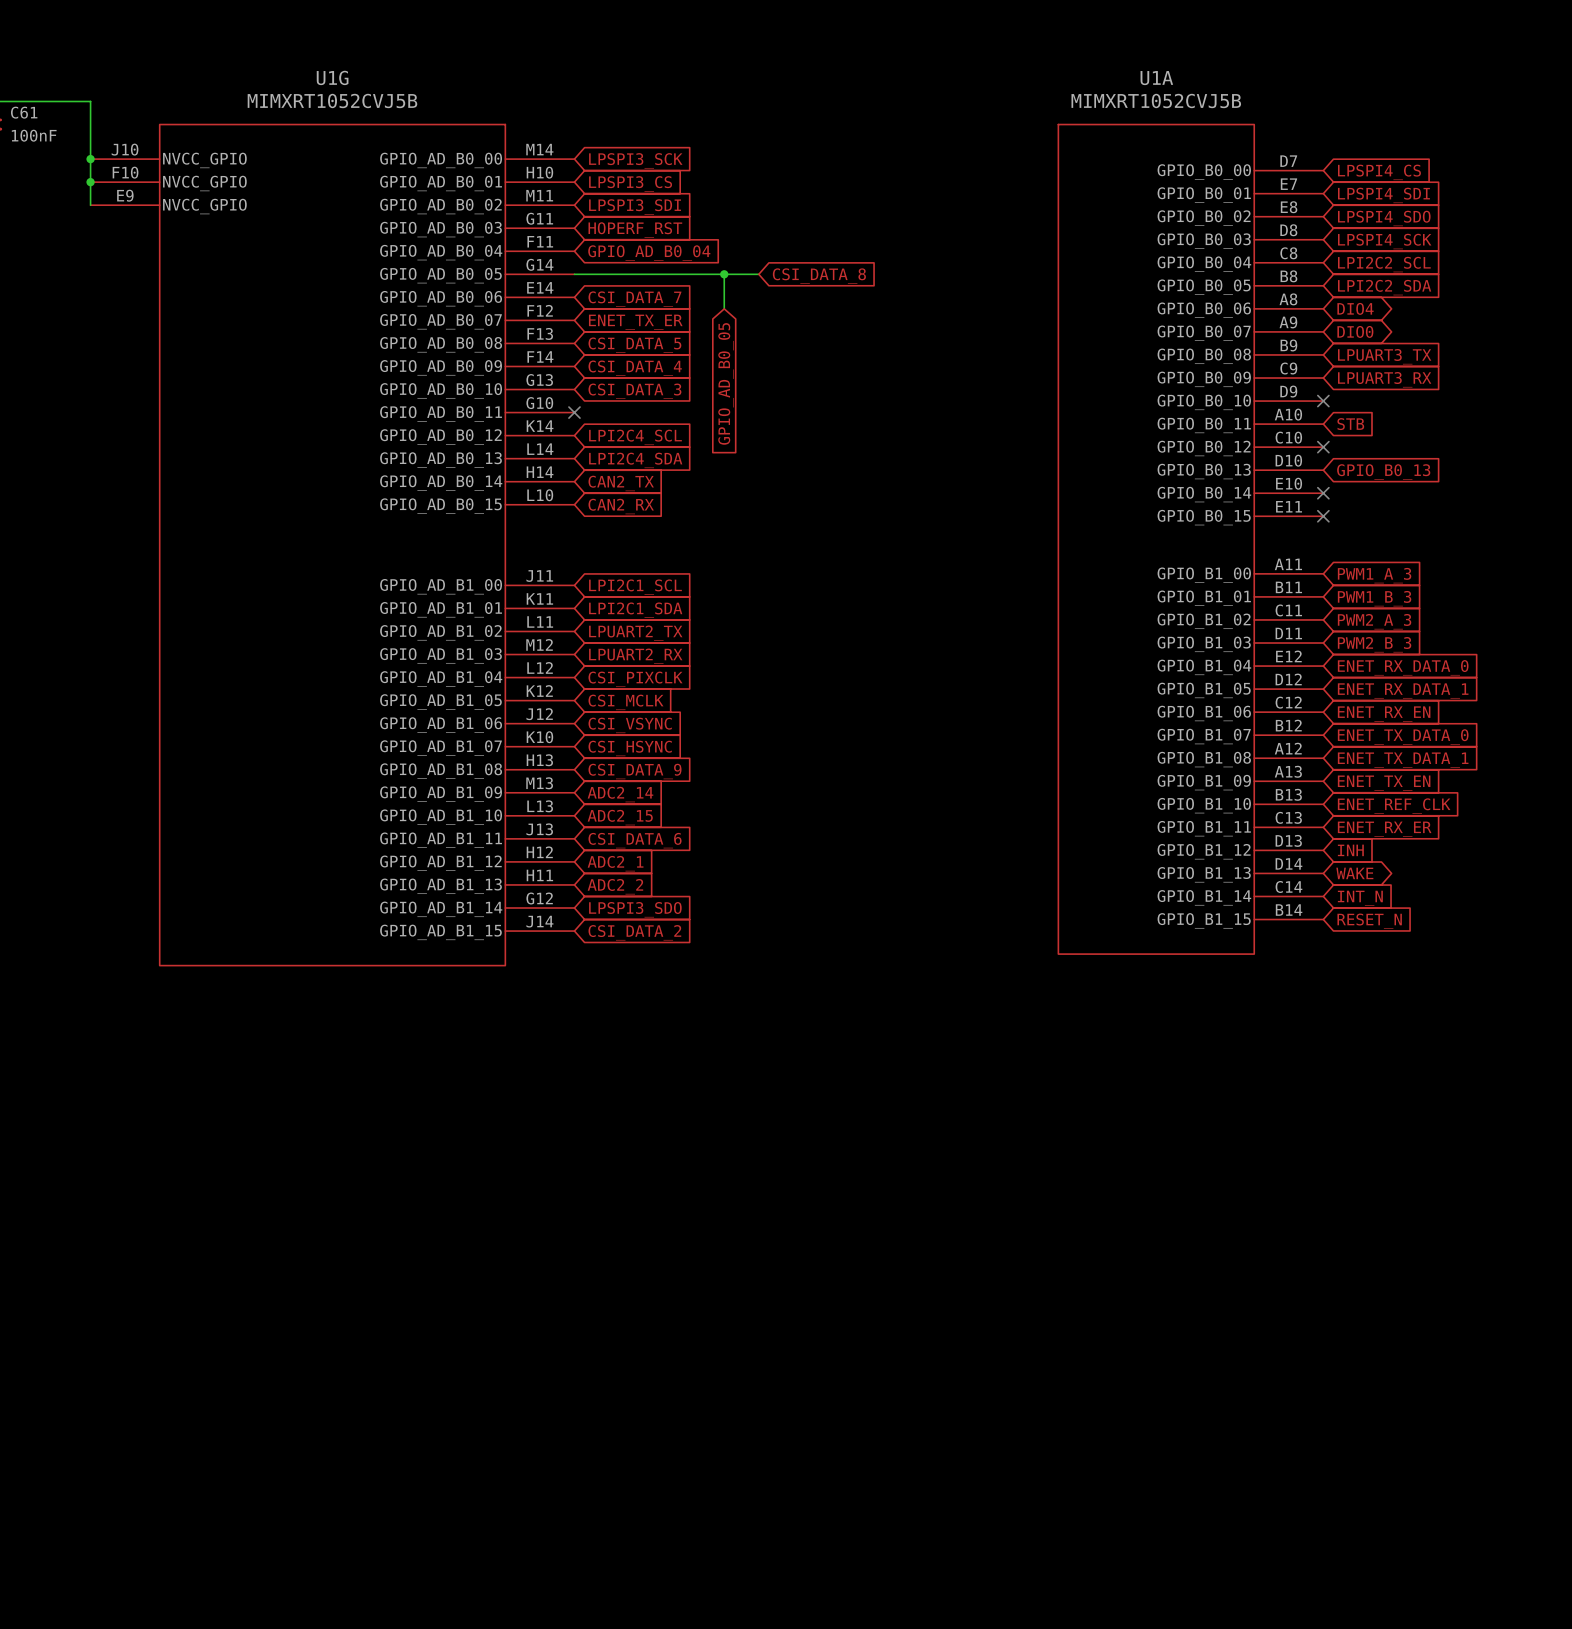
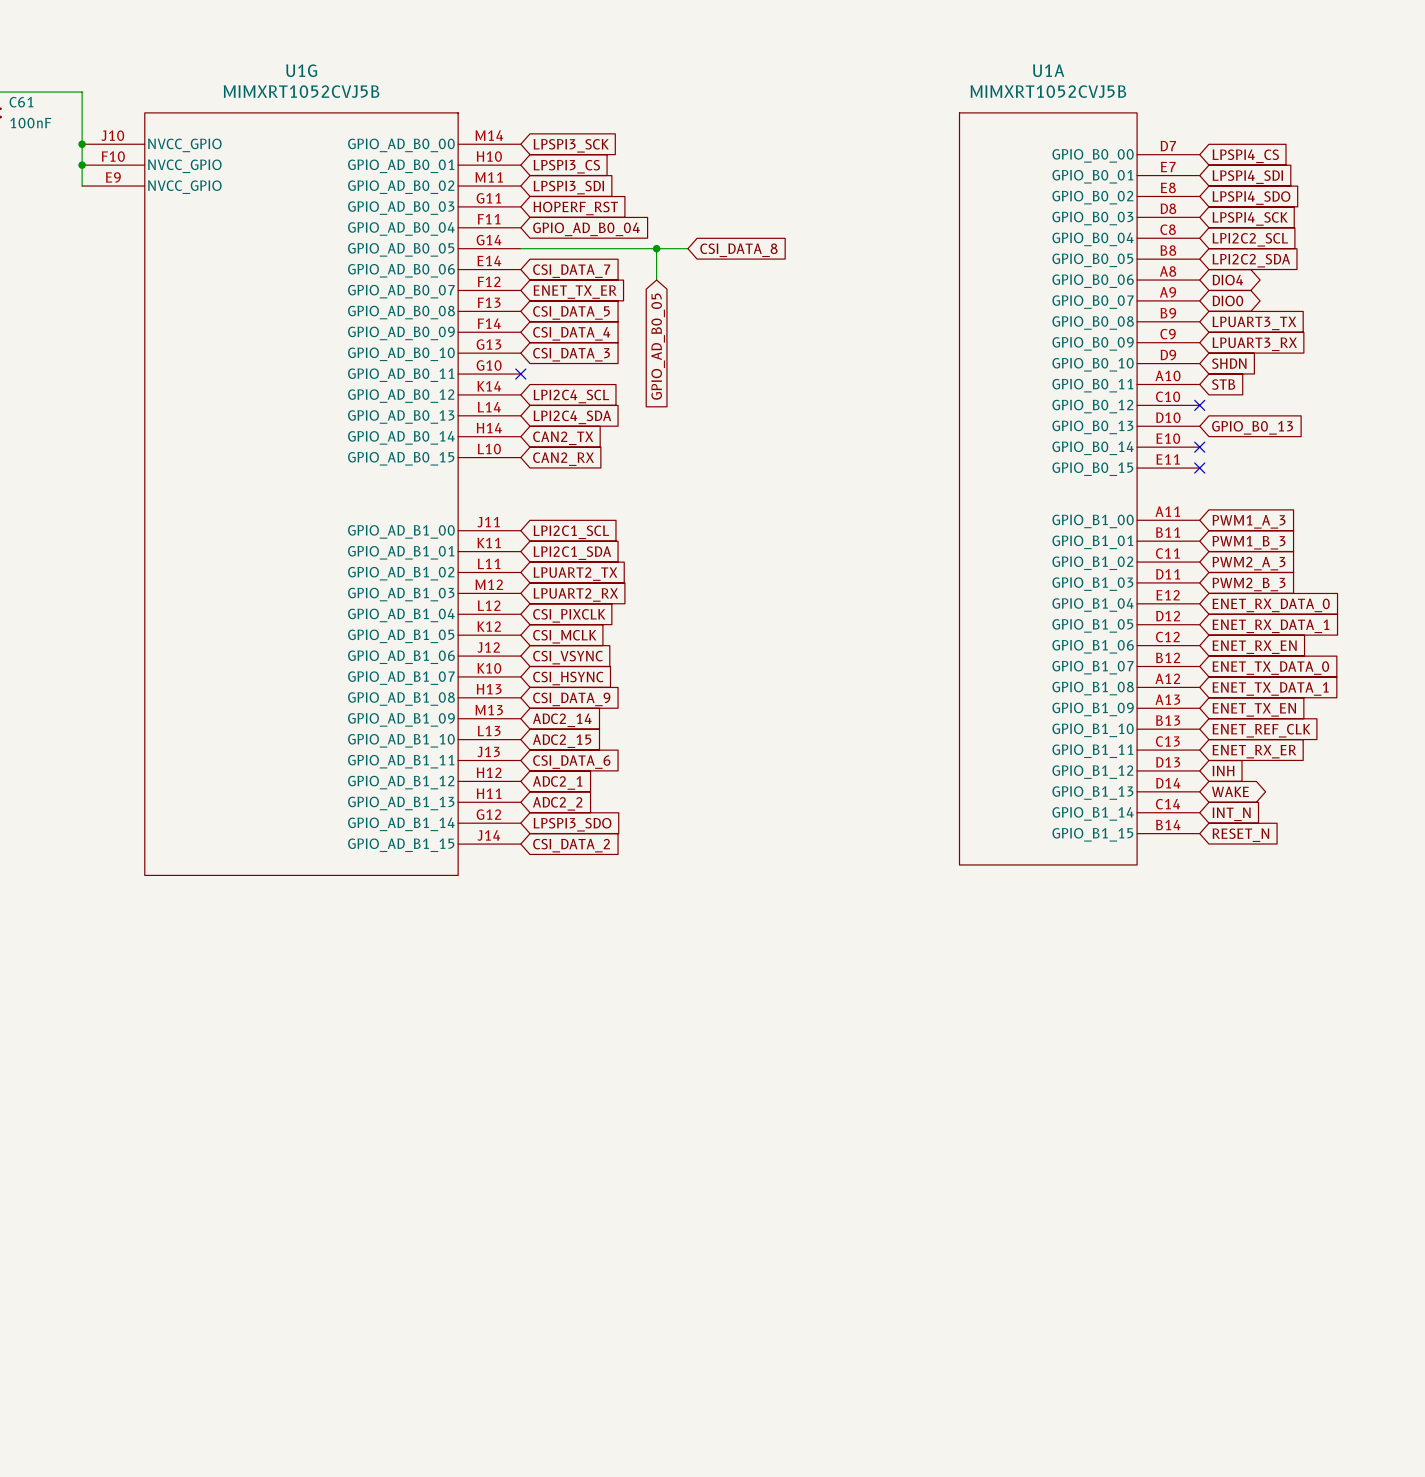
no-connect mark: (1323, 401) -> none
global label: none -> SHDN (1229, 363)

